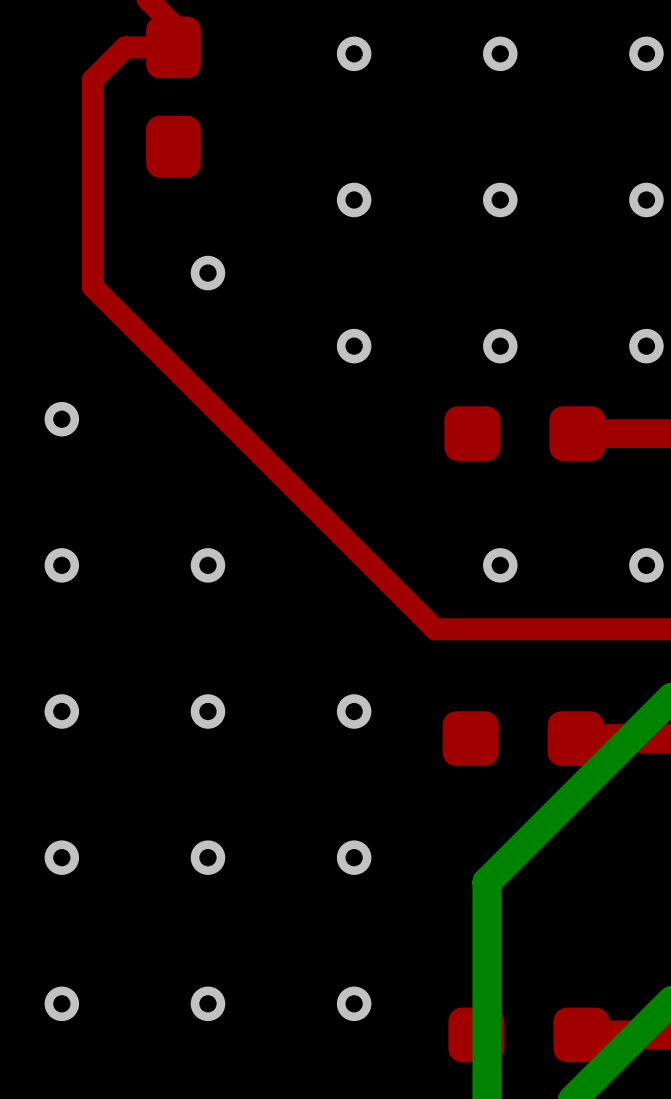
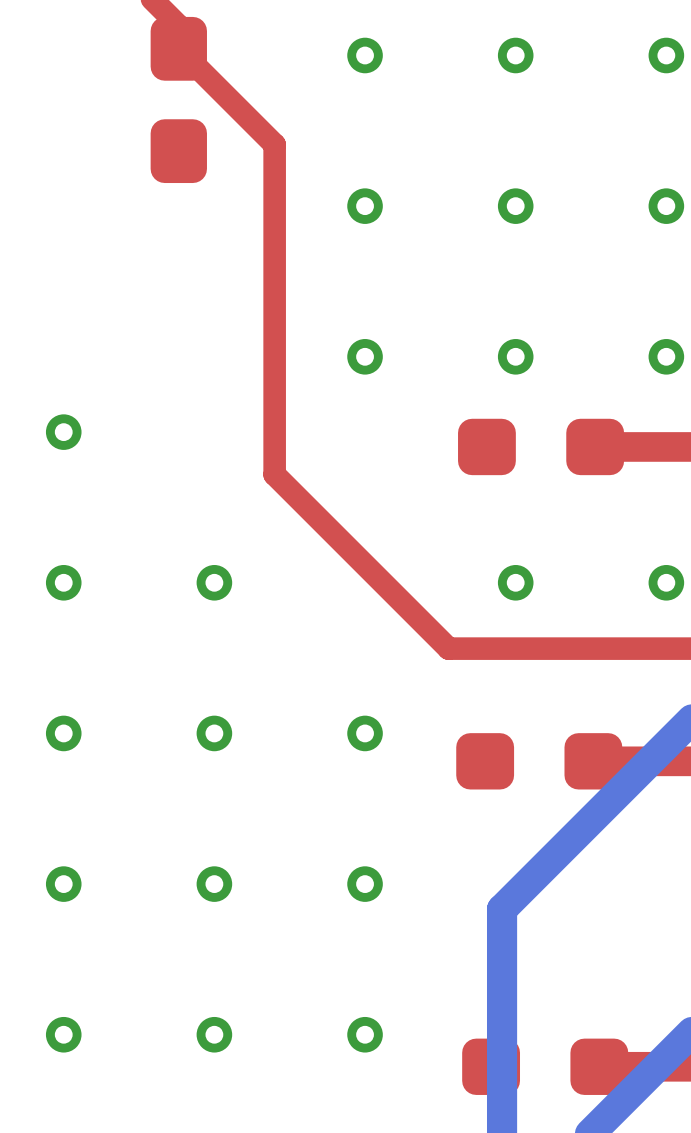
top track: (173, 47) (125, 47) (92, 79) (92, 286) (266, 460) -> (178, 48) (274, 144) (274, 474)
via: (207, 273) -> none

